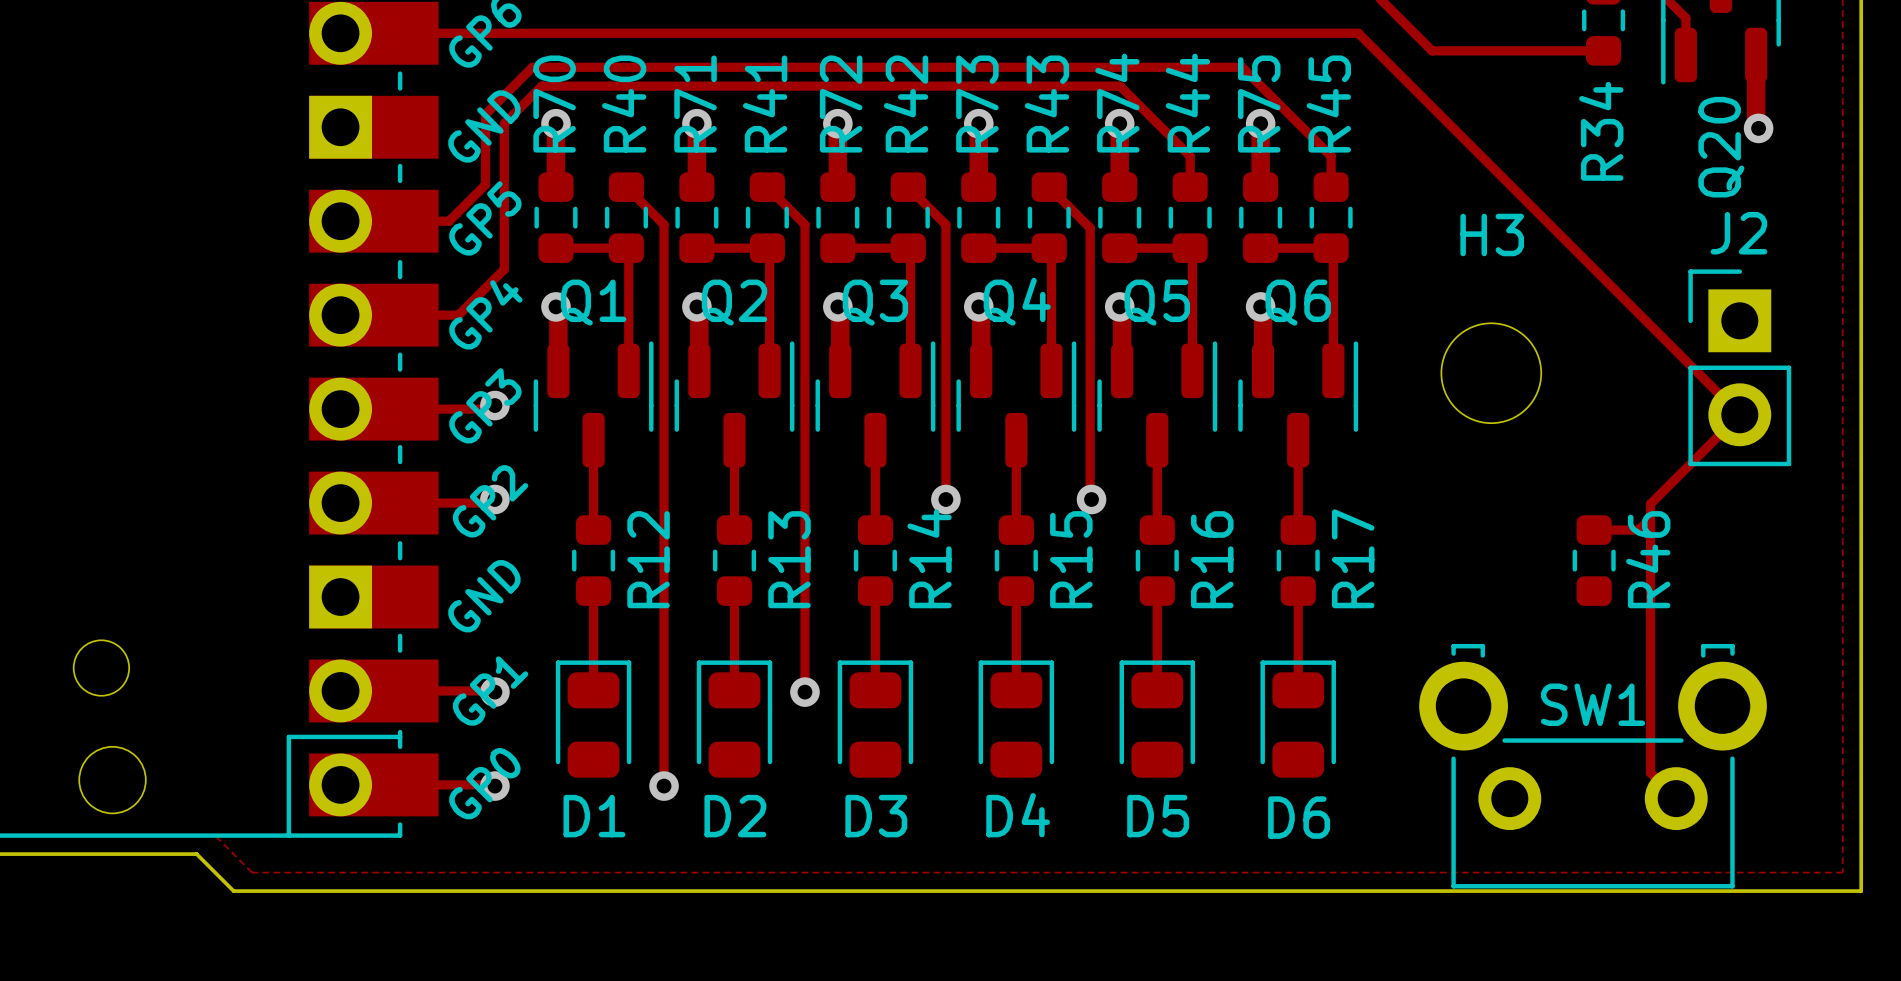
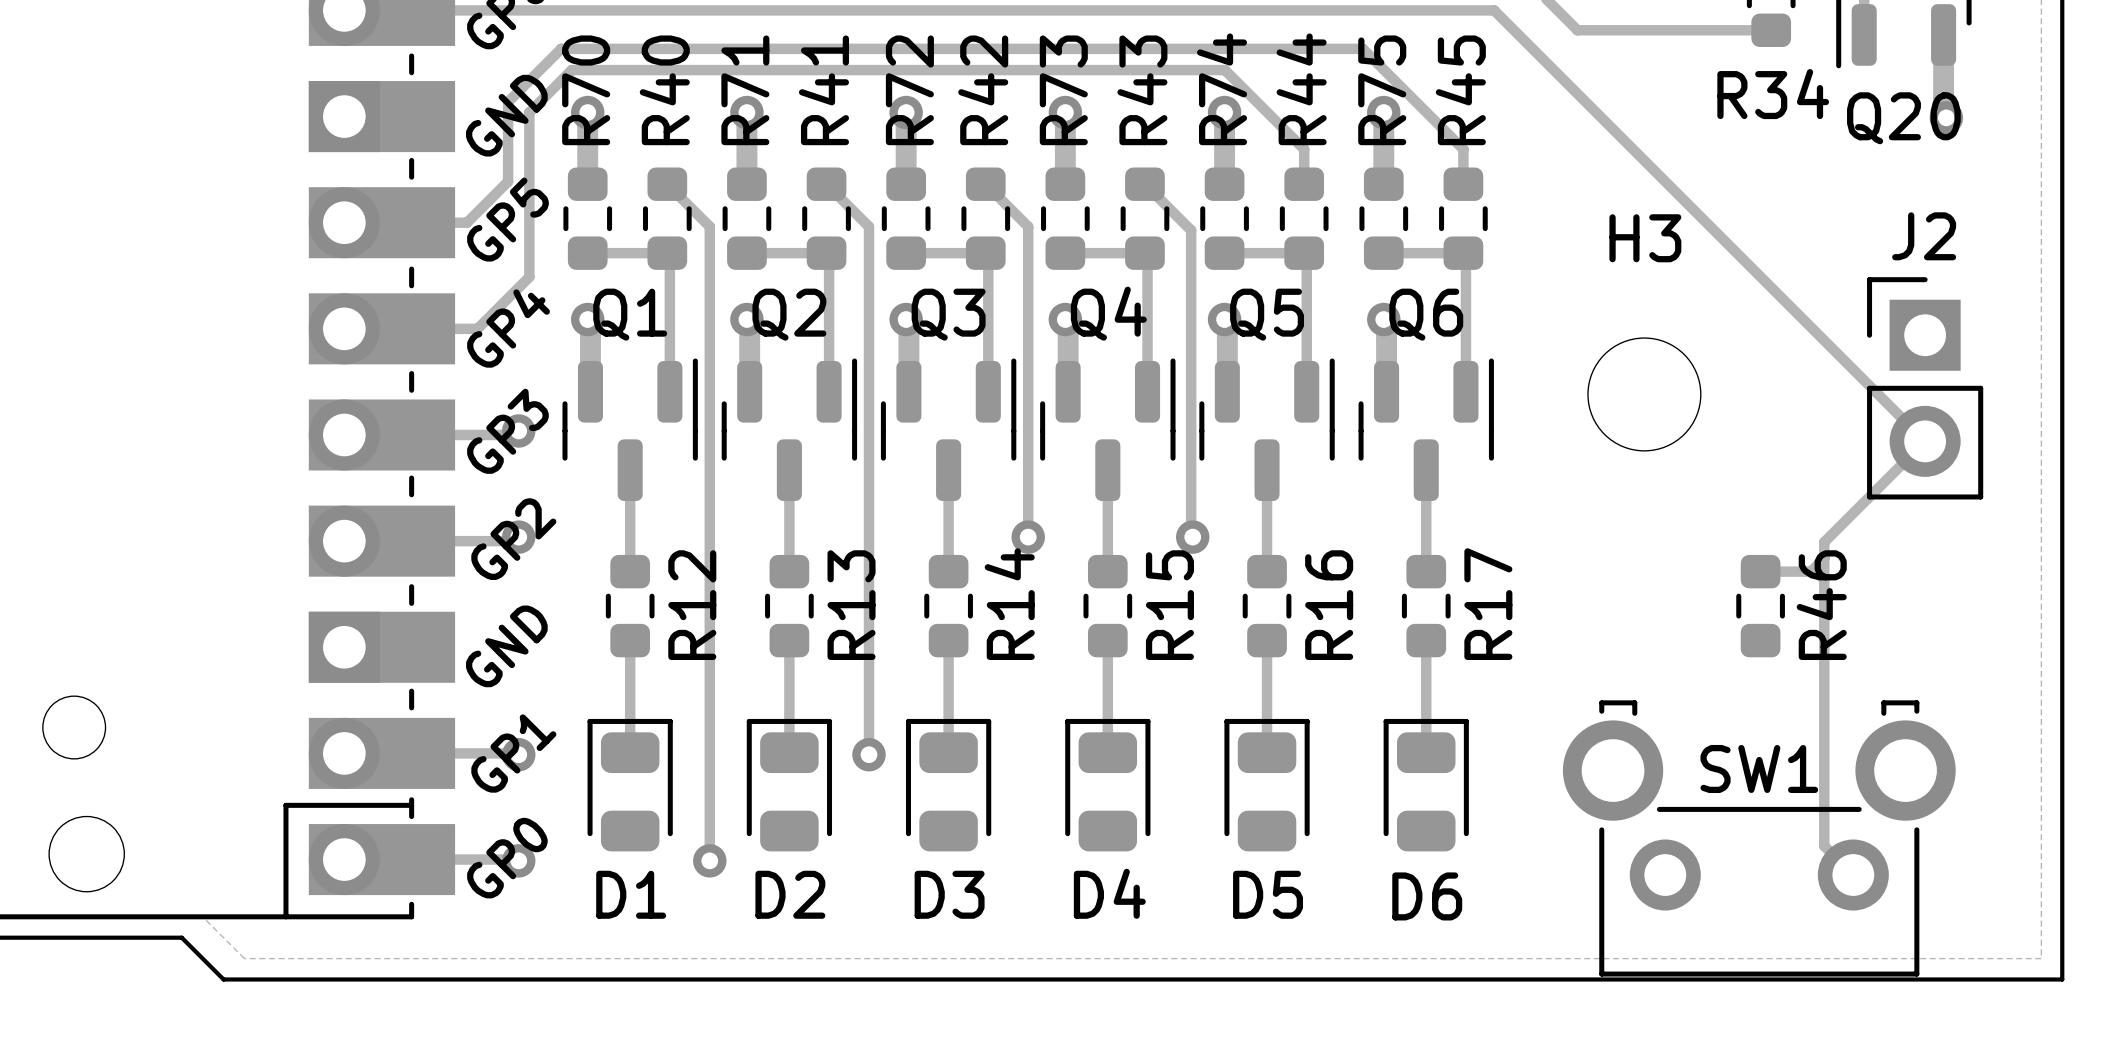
R34 name rotation: 0° (1601, 131) -> 90° clockwise (1773, 94)
Q20 name rotation: 0° (1721, 147) -> 90° clockwise (1903, 118)

